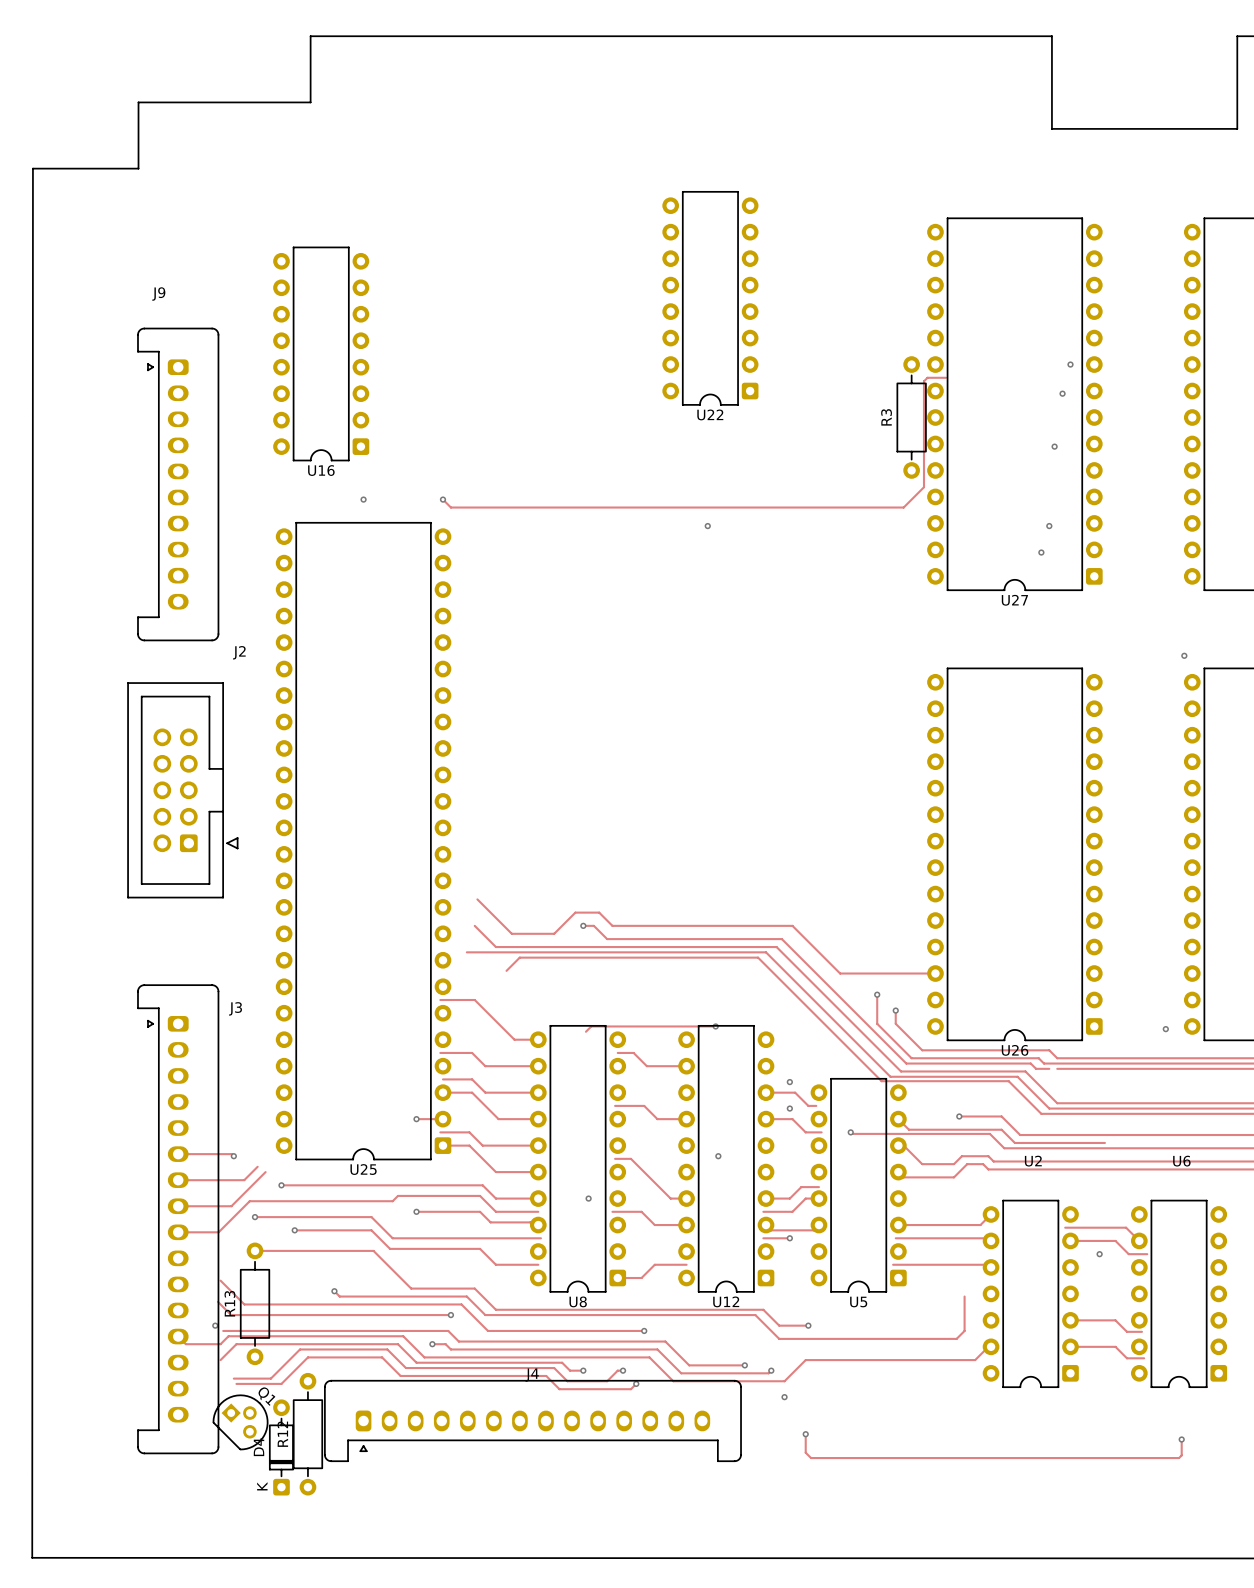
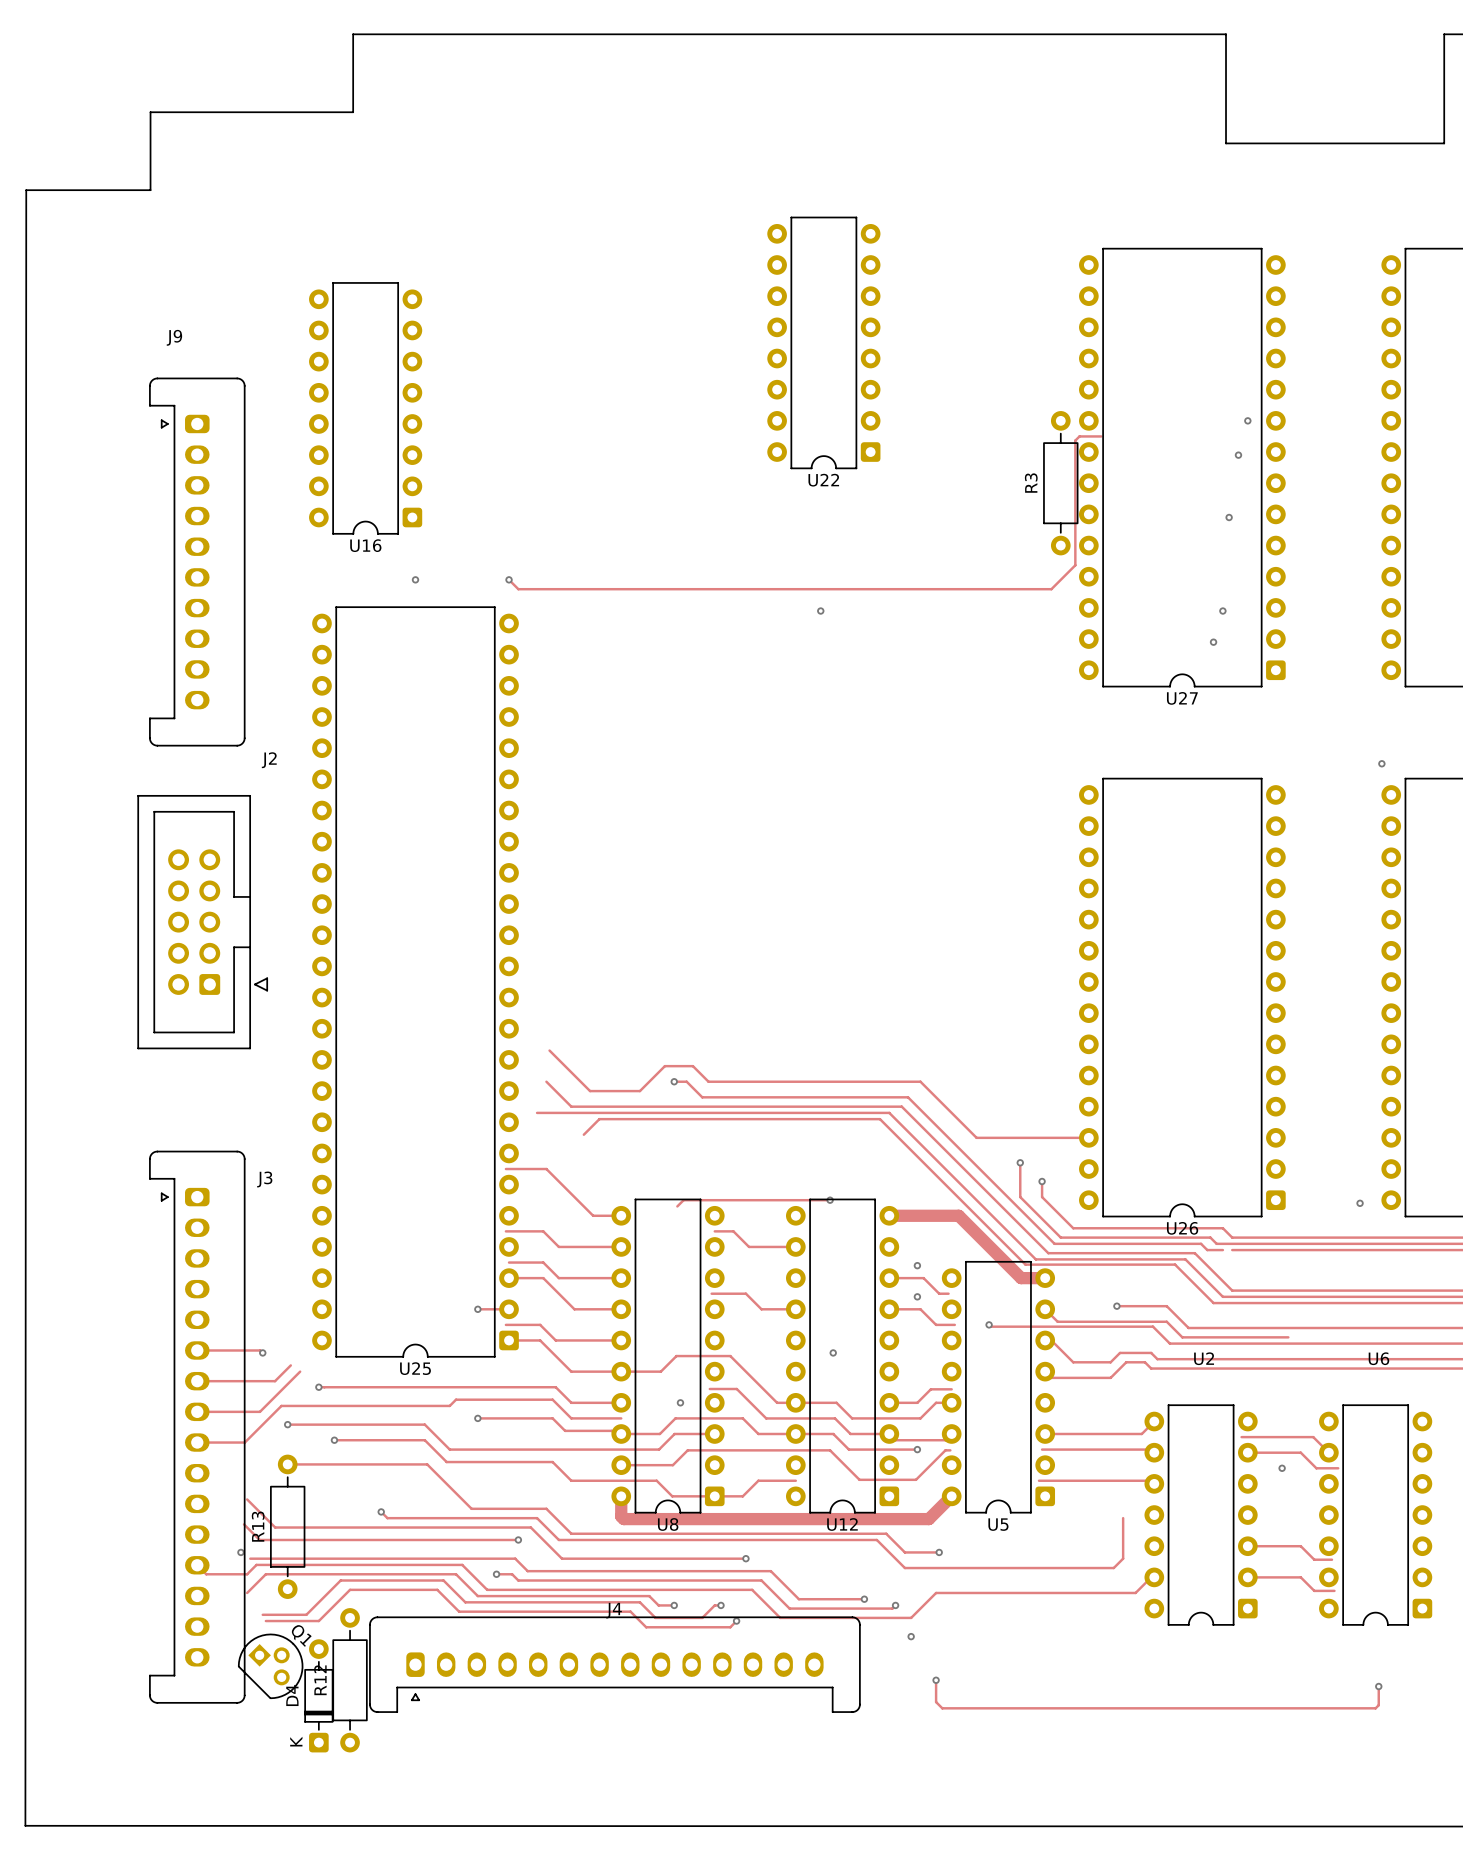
track: none -> (889, 1215) (958, 1215) (1021, 1278) (1045, 1278)
track: none -> (711, 1356) (676, 1356) (660, 1371) (621, 1371)
track: none -> (709, 1389) (736, 1389) (766, 1418) (834, 1418) (850, 1433) (889, 1433)
track: none -> (795, 1402) (836, 1402) (852, 1418) (886, 1418)
track: none -> (708, 1418) (675, 1418) (659, 1433) (621, 1433)
track: none -> (714, 1433) (674, 1433) (659, 1449) (624, 1449)
track: none -> (795, 1433) (833, 1433) (848, 1449) (886, 1449)
track: none -> (950, 1450) (945, 1450) (915, 1479) (859, 1479) (830, 1450) (687, 1450) (672, 1465) (621, 1465)
track: none -> (621, 1480) (656, 1480) (672, 1496) (714, 1496)
track: none -> (621, 1496) (621, 1516) (623, 1519) (928, 1519) (951, 1496)

